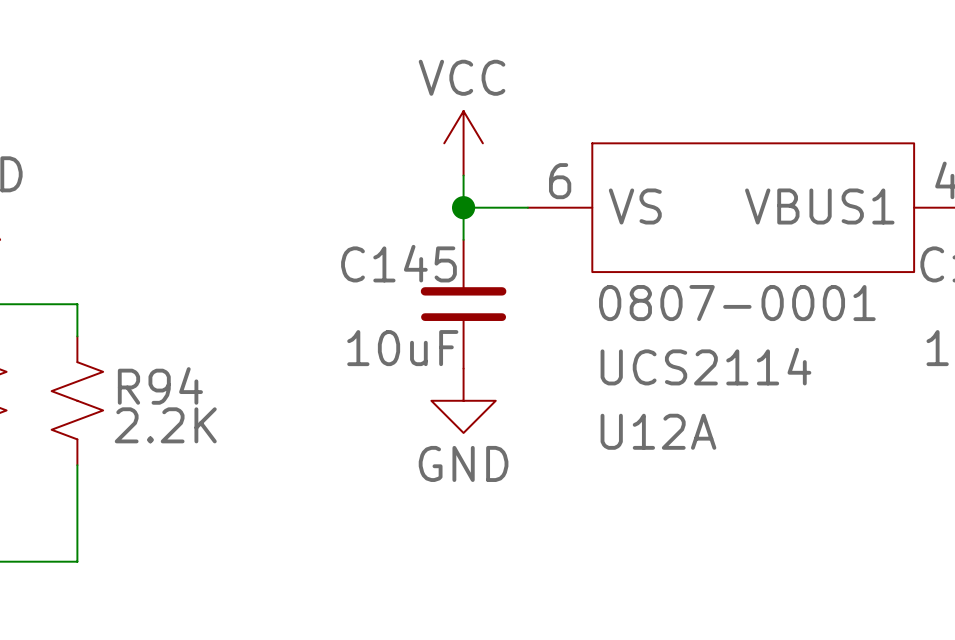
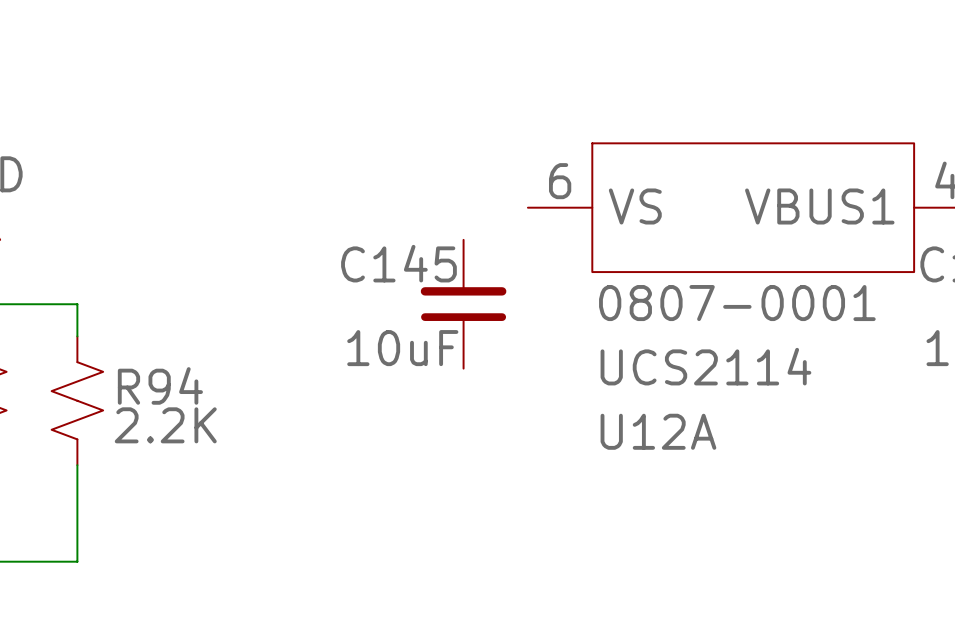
power symbol: VCC (463, 143) -> none
wire: (463, 175) (463, 239) -> none
wire: (463, 207) (527, 207) -> none
junction: (463, 207) -> none
power symbol: GND (463, 400) -> none

